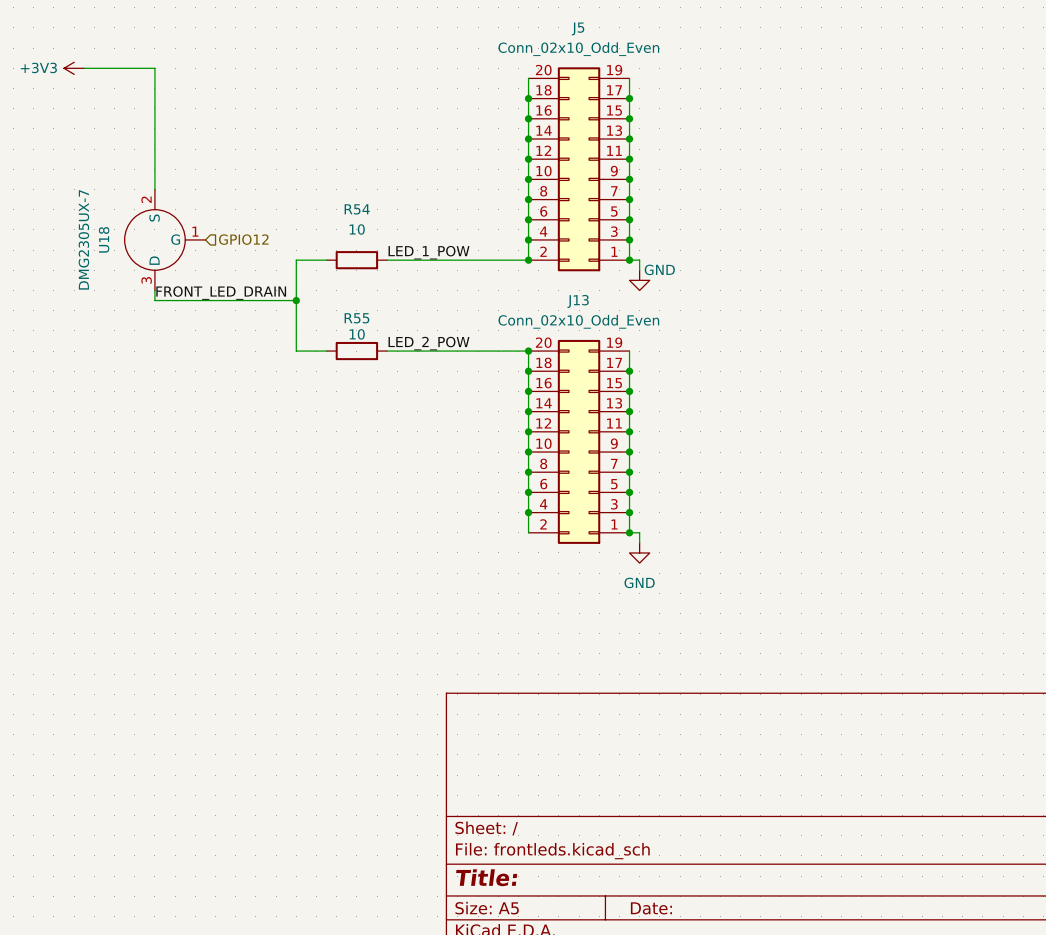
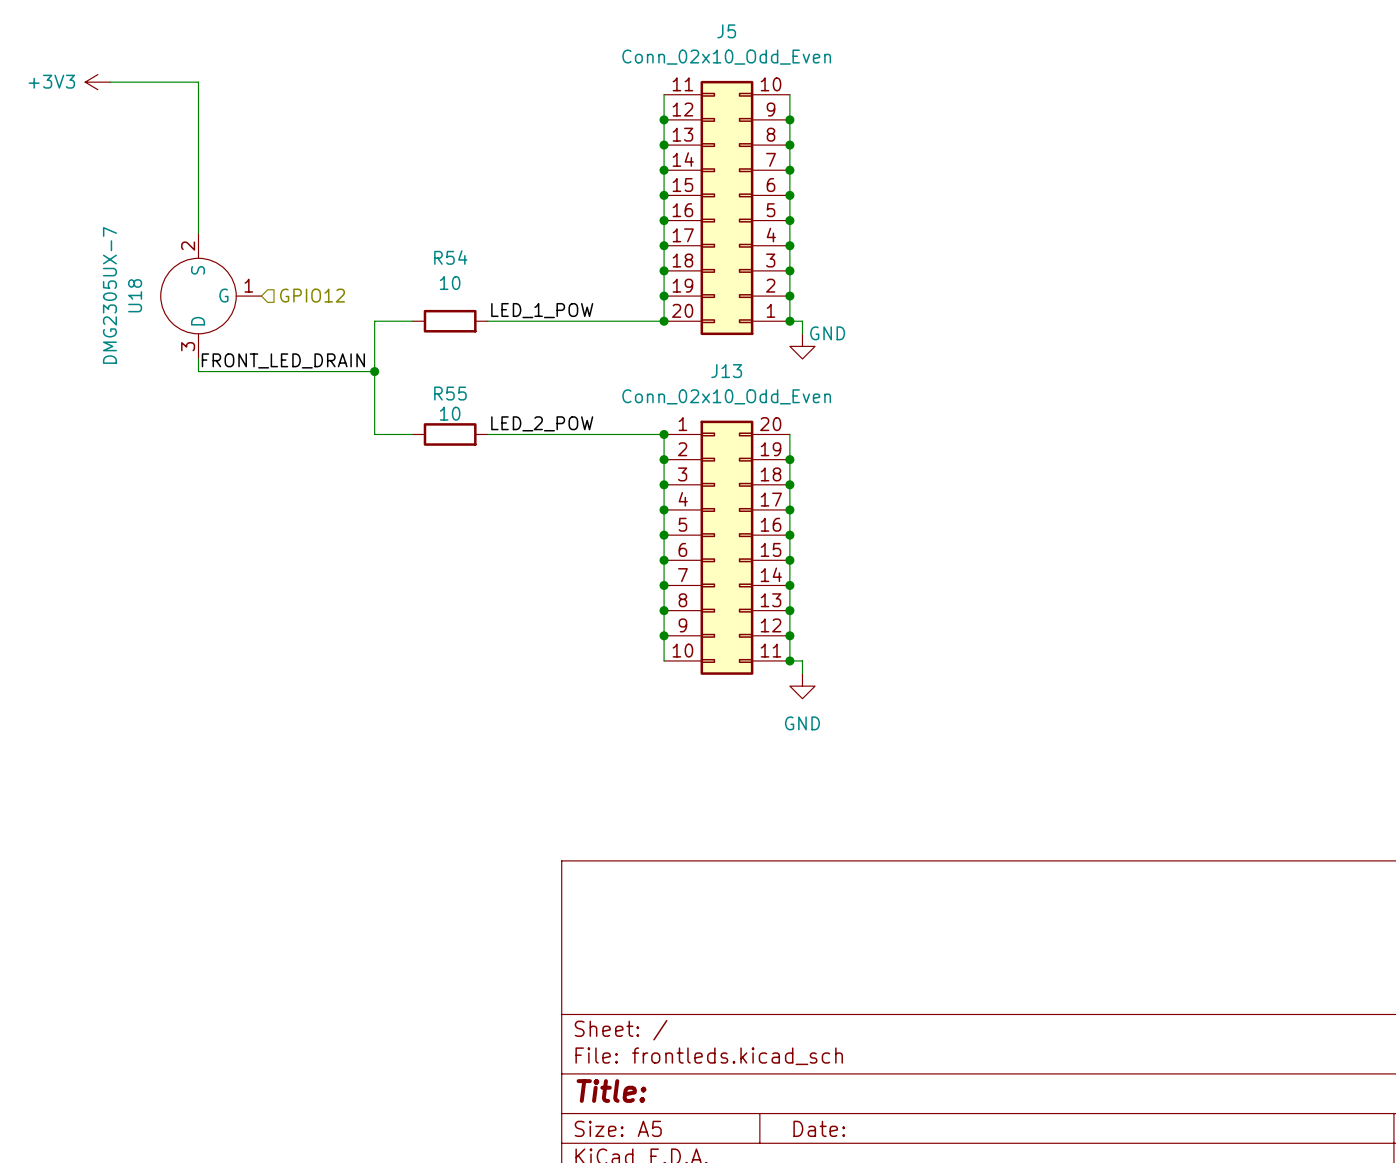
J5 symbol: [528, 67, 630, 272] -> [664, 80, 790, 336]
J13 symbol: [528, 339, 630, 544] -> [664, 420, 790, 675]

